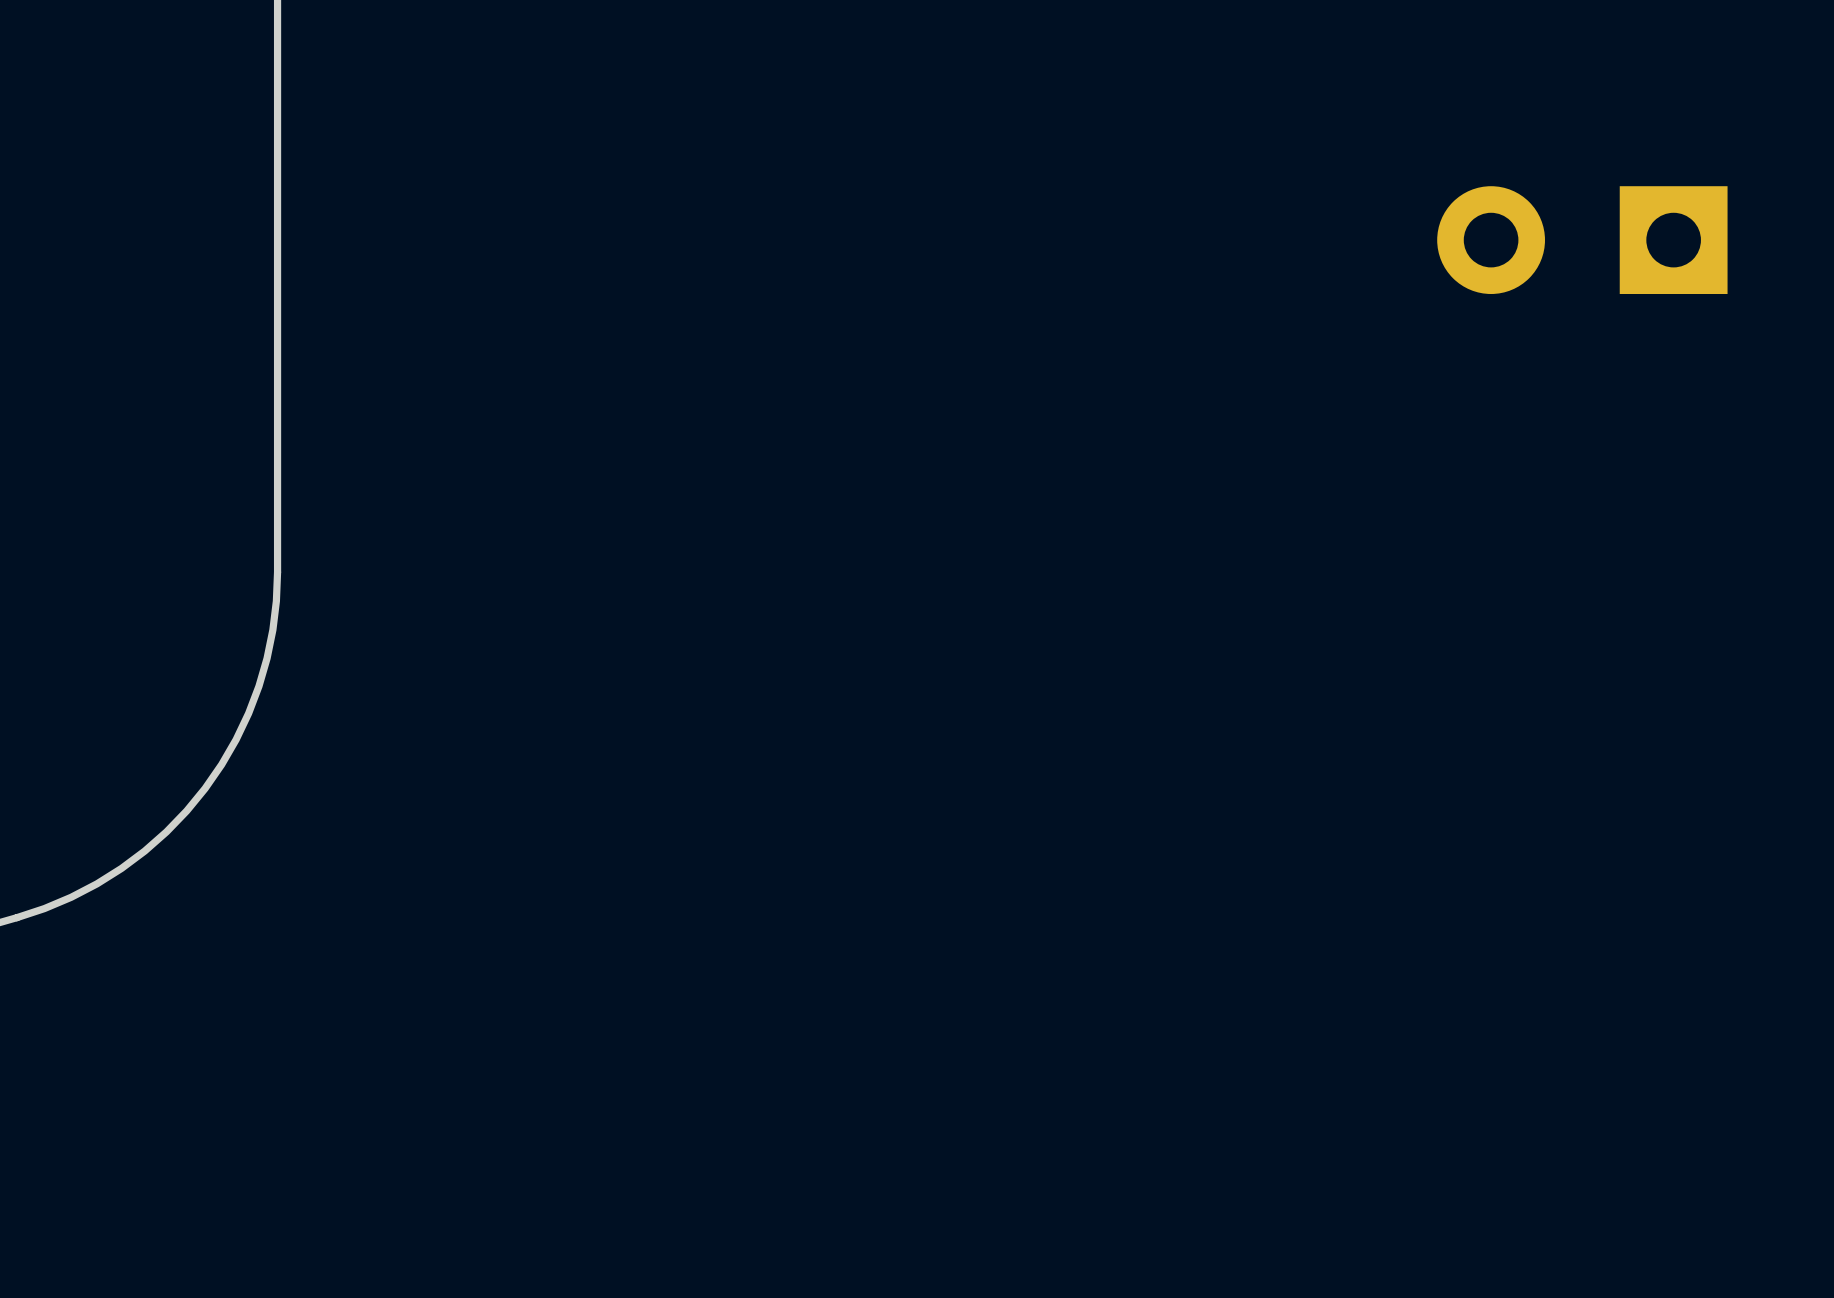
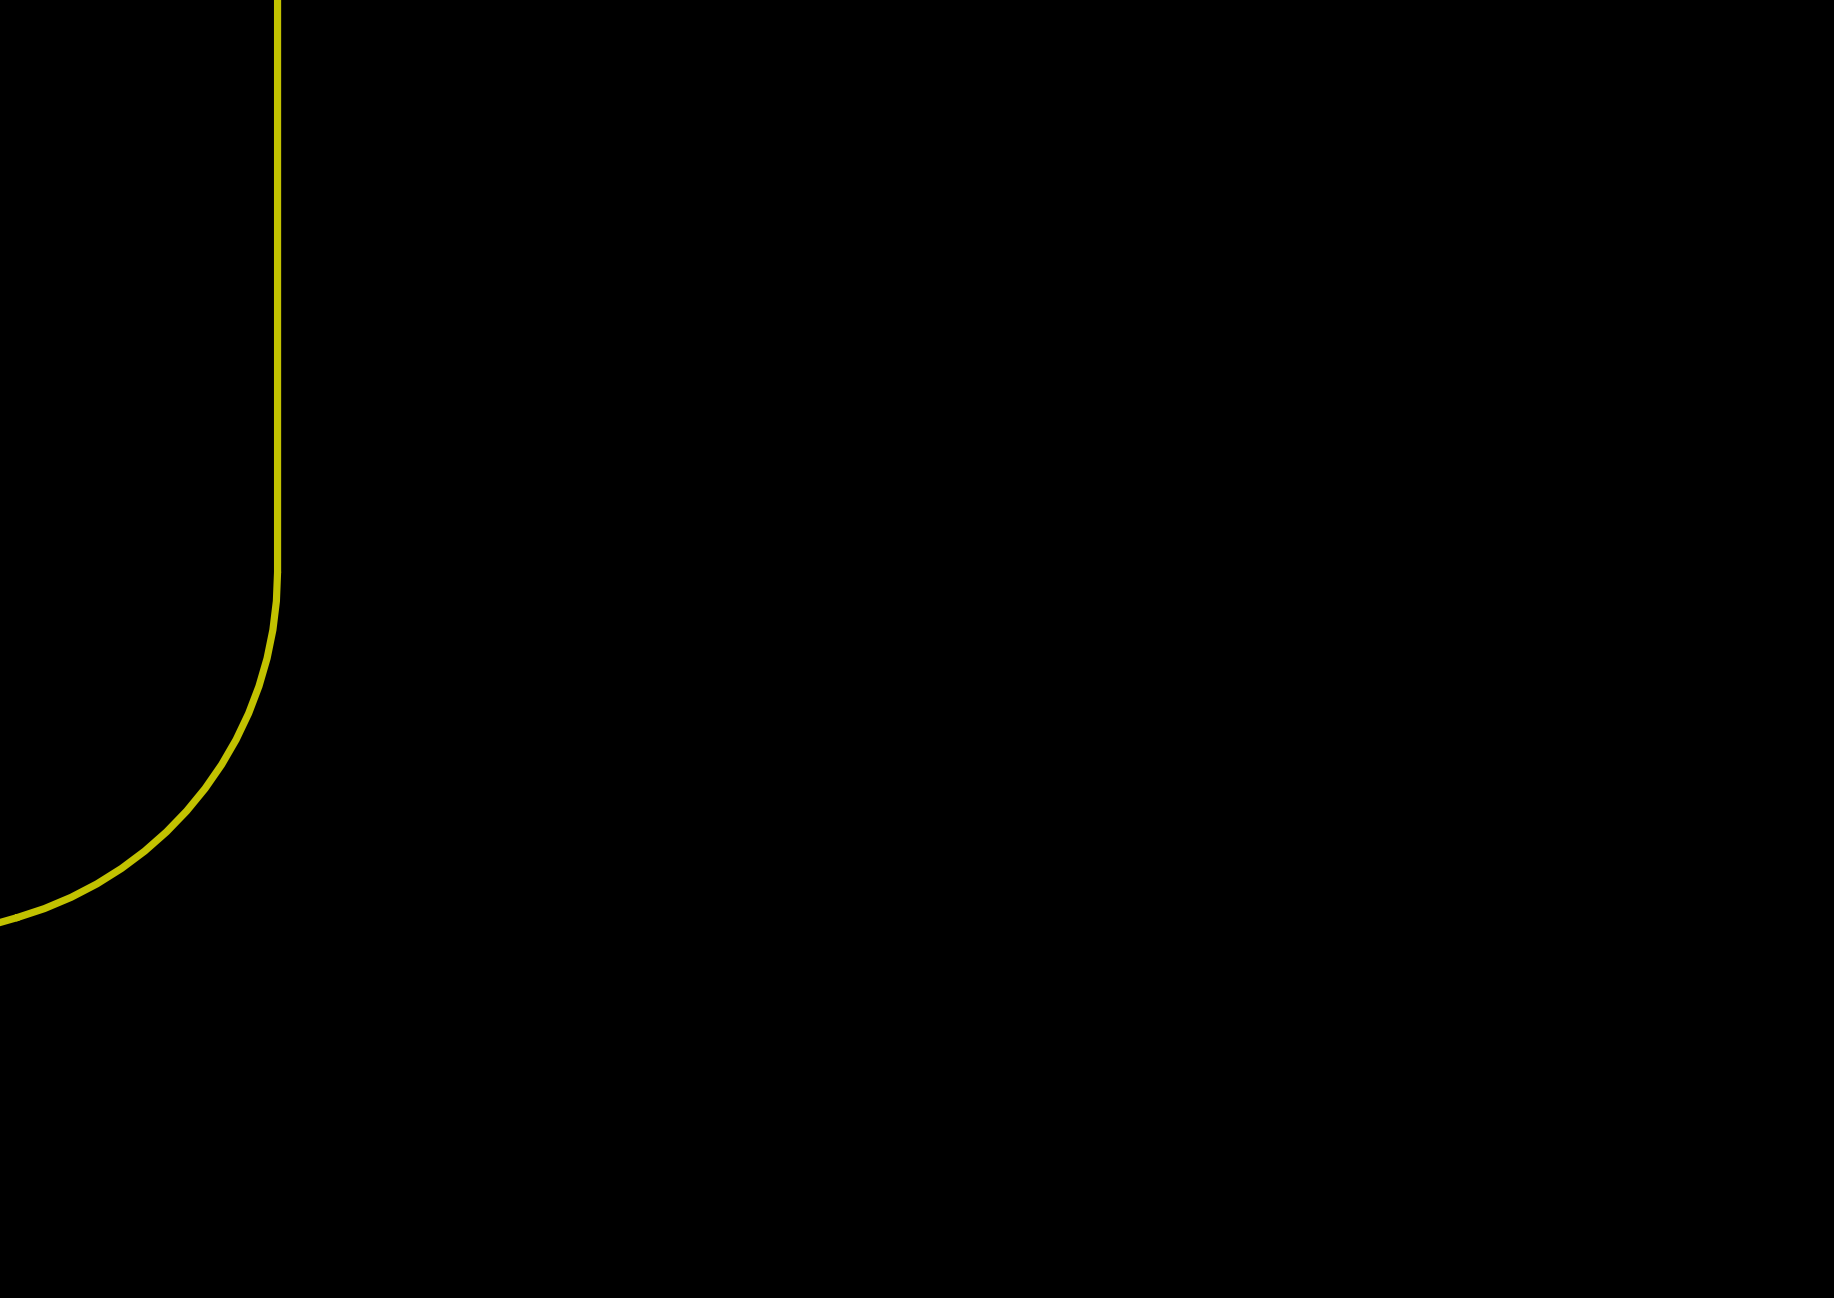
part: (1582, 240) -> none

